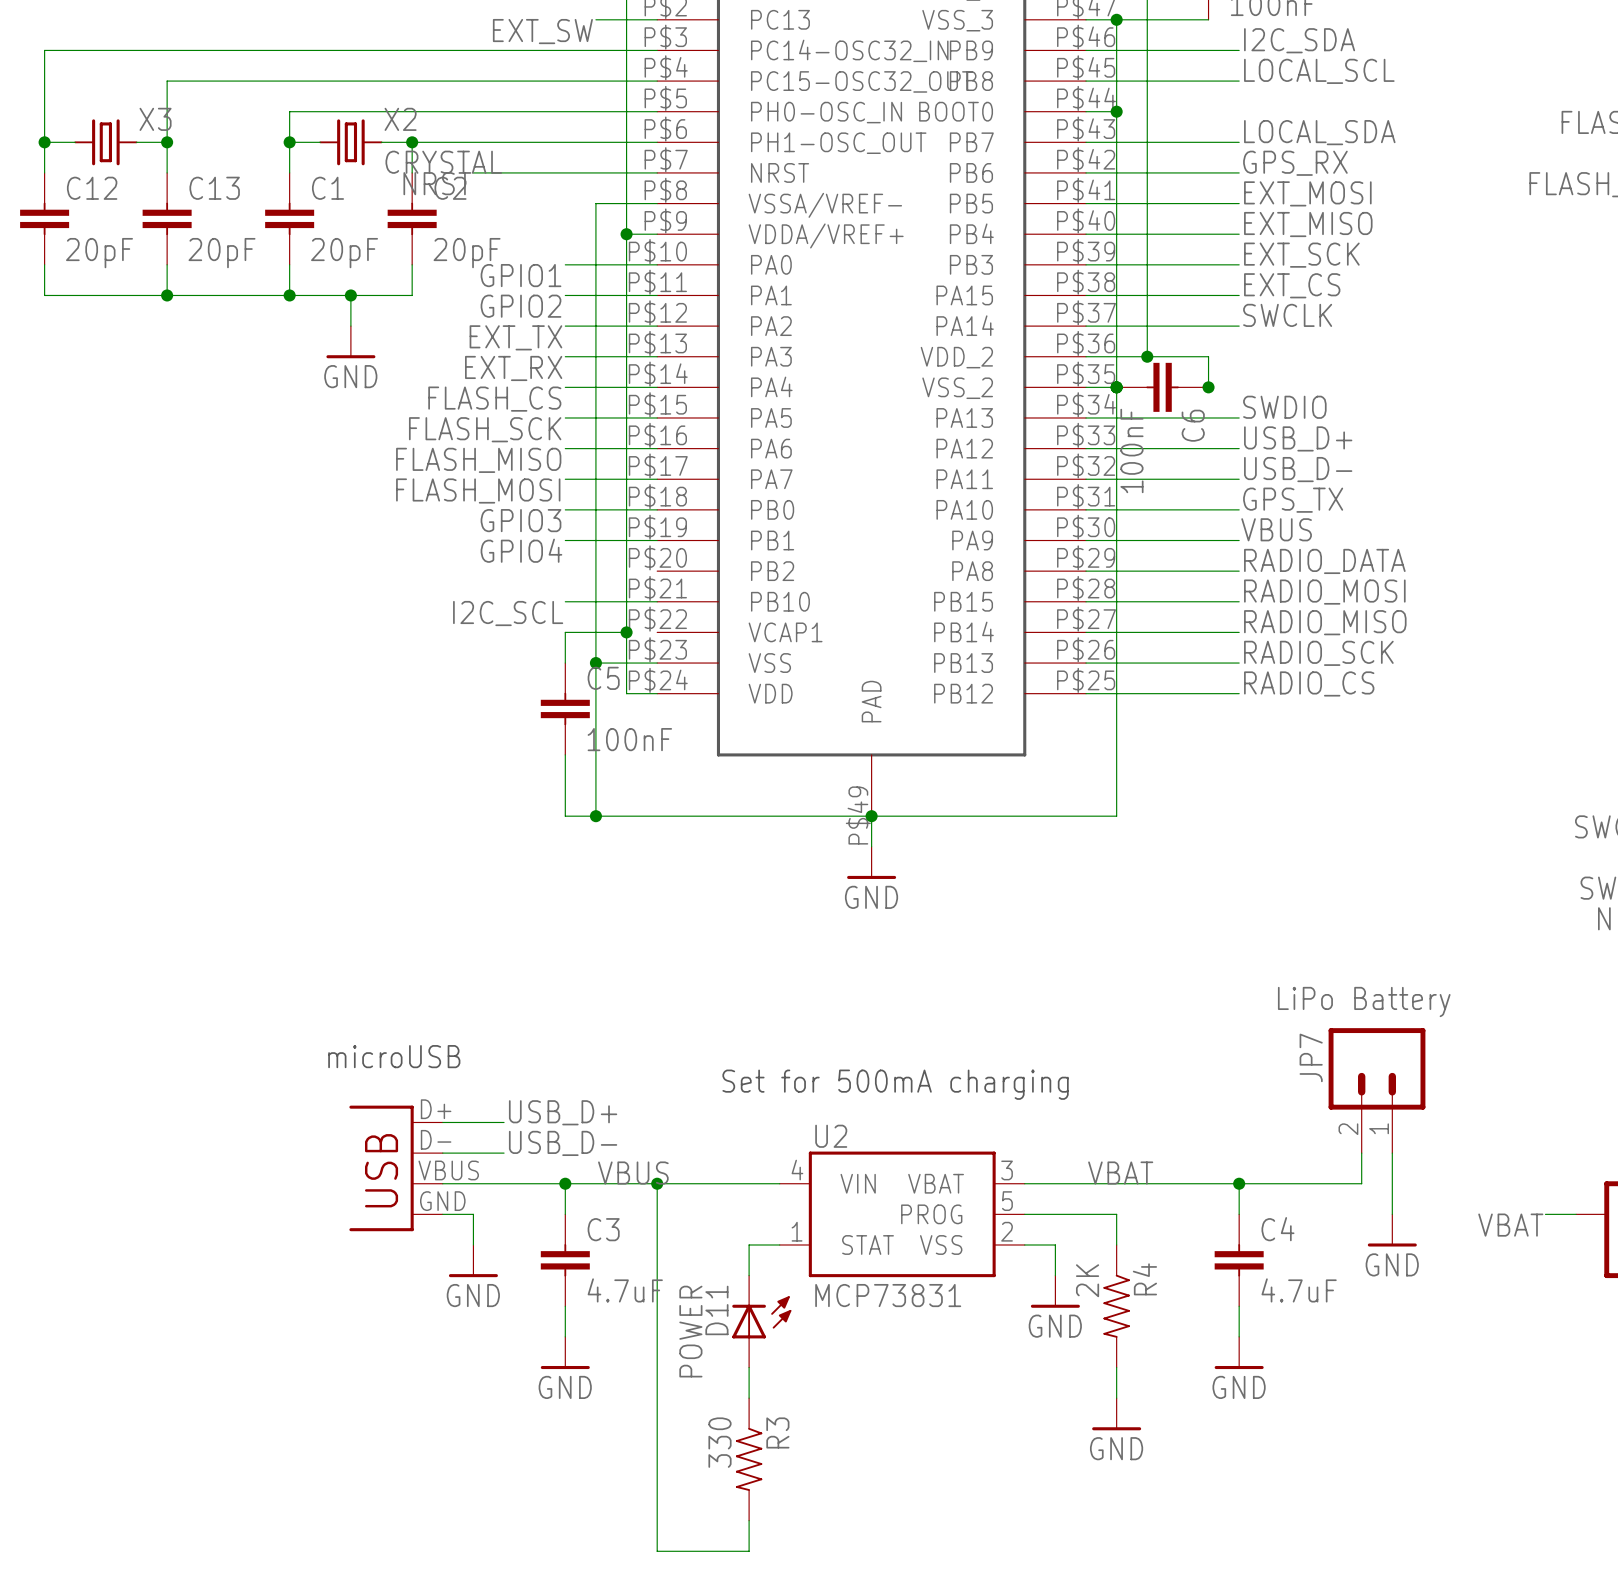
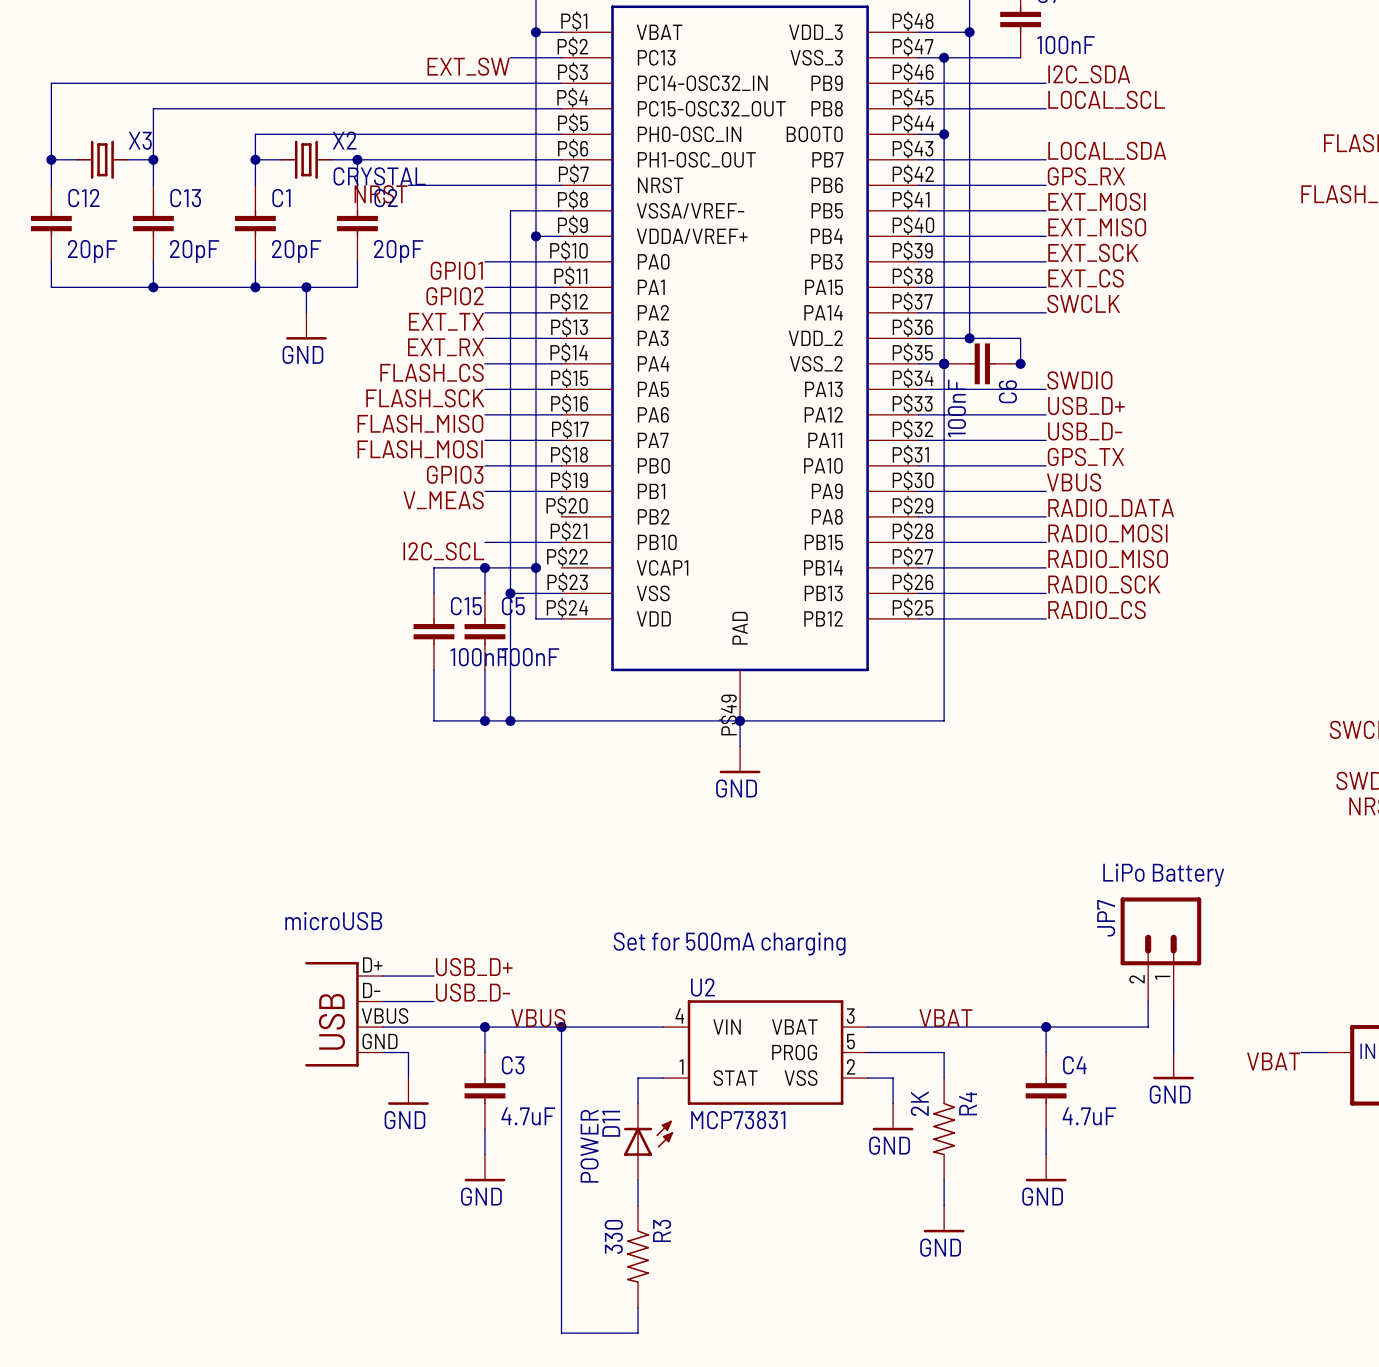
label: GPIO4 (521, 550) -> V_MEAS (443, 500)
wire: none -> (484, 567) (433, 567) (433, 593)
junction: none -> (484, 567)
C15: none -> 100nF (433, 631)
wire: none -> (433, 669) (433, 720) (484, 720)
junction: none -> (484, 720)

